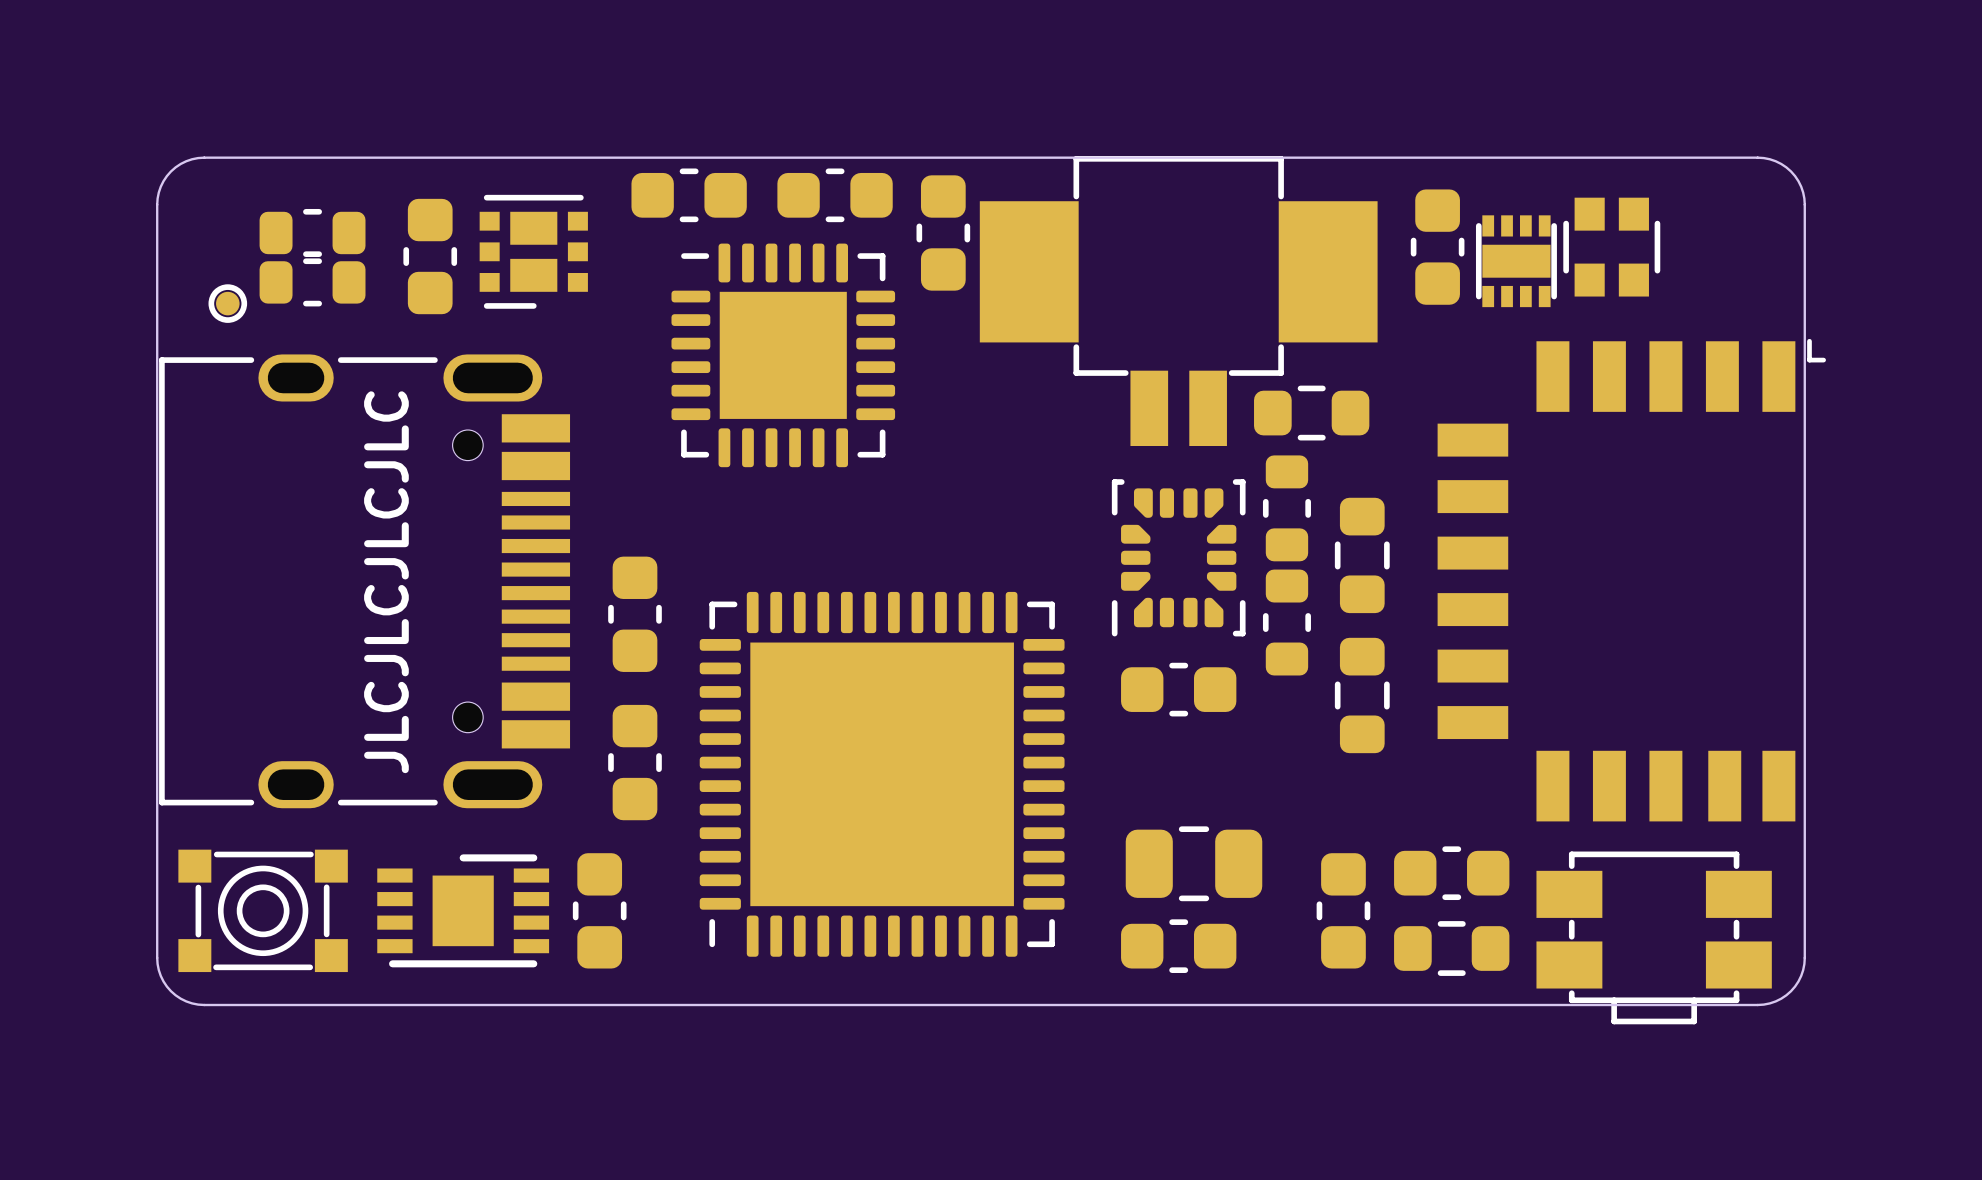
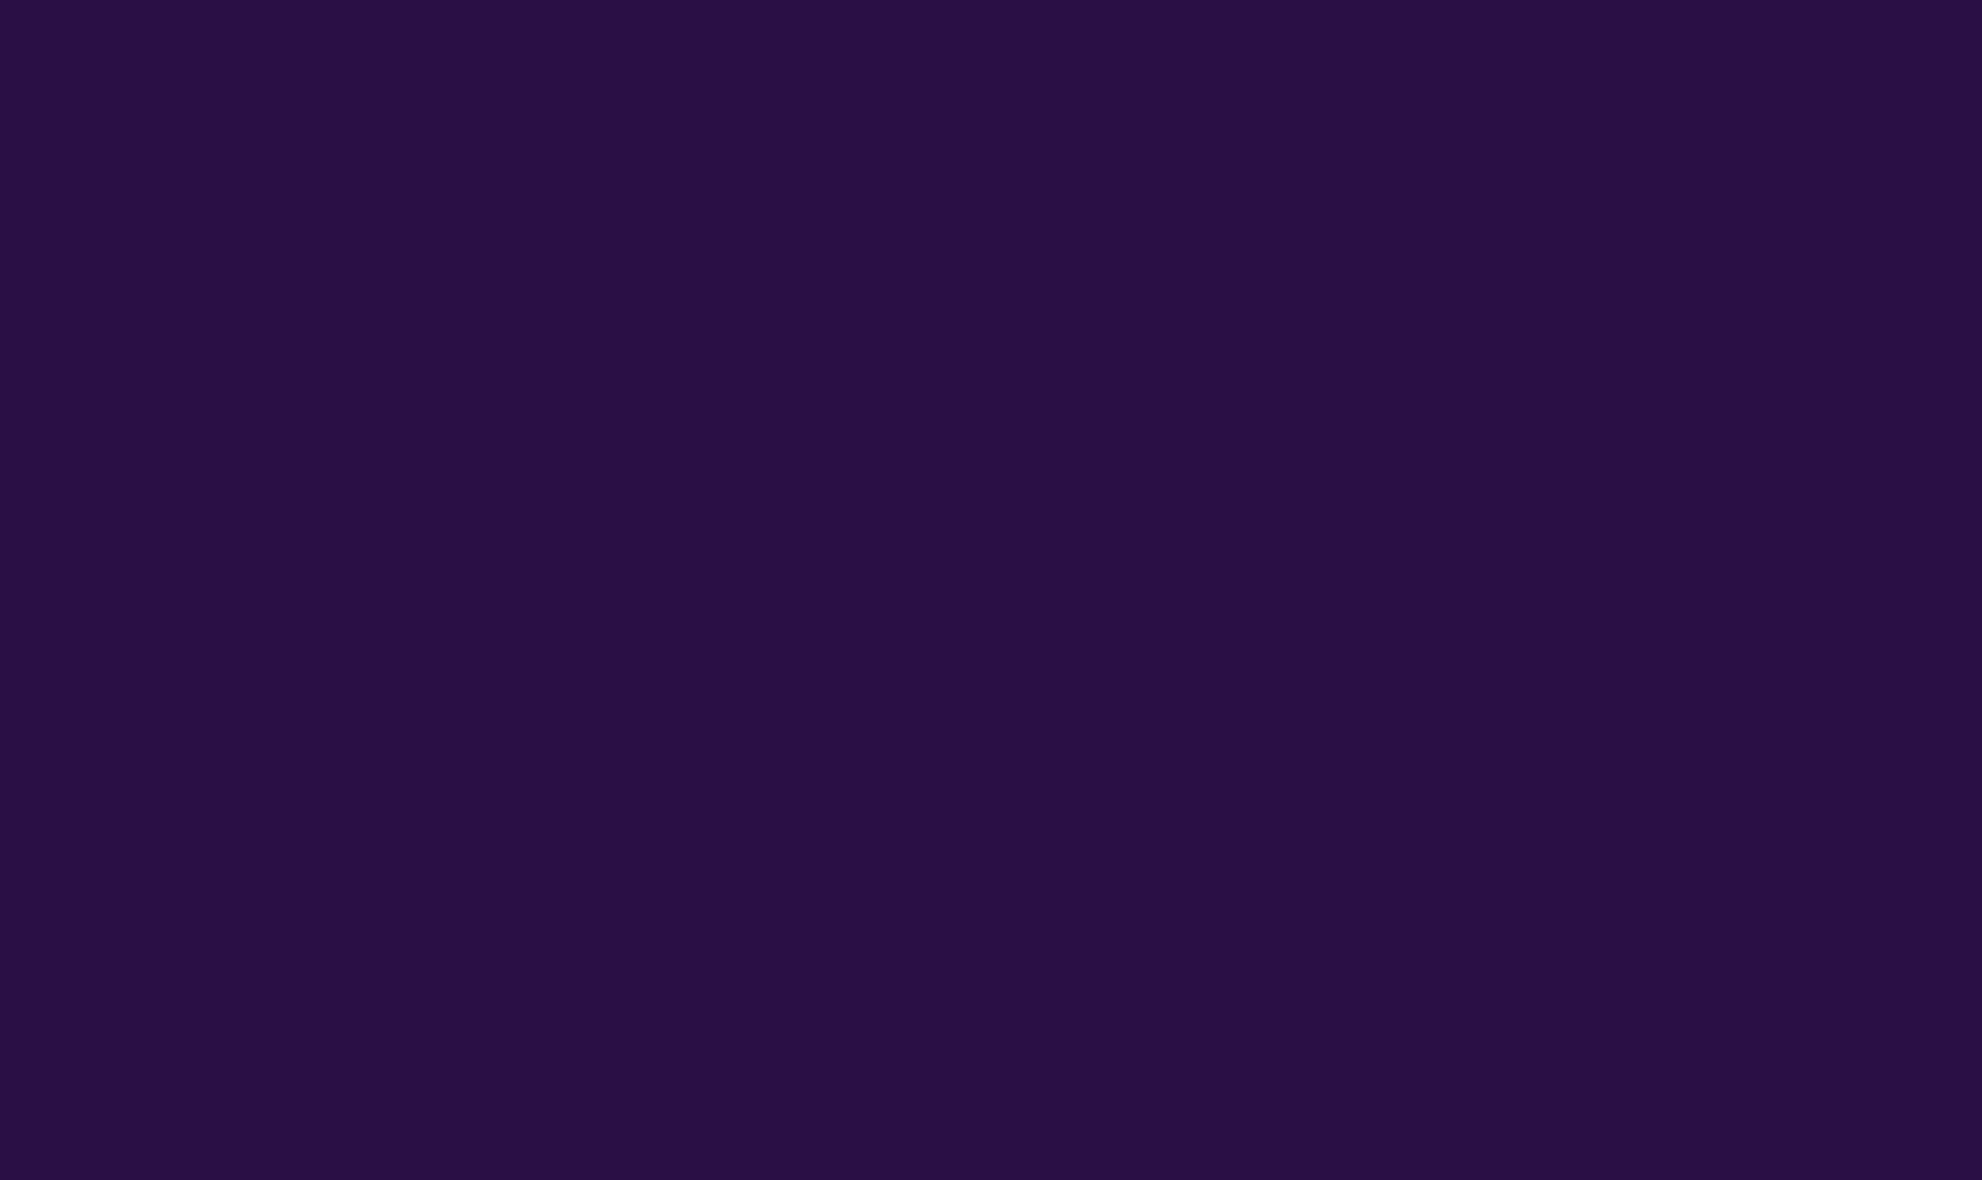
board edge: (204, 157) (1757, 157) (1769, 159) (1781, 163) (1790, 171) (1798, 181) (1803, 192) (1804, 204) (1804, 957) (1803, 970) (1798, 981) (1790, 991) (1781, 998) (1769, 1003) (1757, 1005) (204, 1005) (192, 1003) (180, 998) (170, 991) (163, 981) (158, 970) (157, 957) (157, 204) (160, 186) (170, 171) (186, 161) (204, 157) -> none
part: (689, 195) -> none
part: (835, 195) -> none
part: (312, 232) -> none
part: (943, 232) -> none
part: (1437, 247) -> none
part: (1611, 247) -> none
part: (533, 251) -> none
part: (430, 256) -> none
part: (1516, 261) -> none
part: (312, 282) -> none
part: (1178, 301) -> none
part: (227, 303) -> none
part: (783, 355) -> none
part: (1311, 413) -> none
part: (1286, 508) -> none
part: (1362, 555) -> none
part: (1178, 557) -> none
part: (1631, 580) -> none
part: (364, 581) -> none
text: JLCJLCJLCJLC (386, 582) -> none
part: (634, 614) -> none
part: (1286, 622) -> none
part: (1178, 689) -> none
part: (1362, 695) -> none
part: (634, 762) -> none
part: (882, 774) -> none
part: (1194, 863) -> none
part: (1451, 873) -> none
part: (263, 910) -> none
part: (463, 910) -> none
part: (599, 910) -> none
part: (1343, 910) -> none
part: (1654, 937) -> none
part: (1178, 946) -> none
part: (1451, 948) -> none

